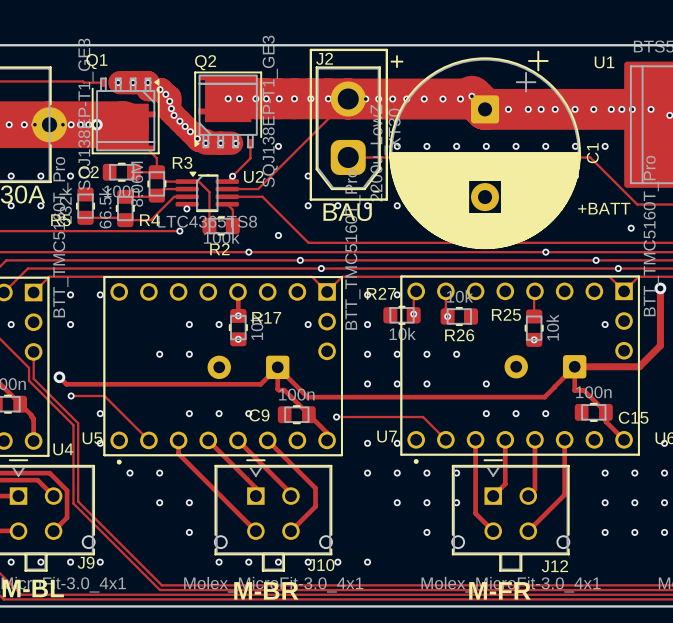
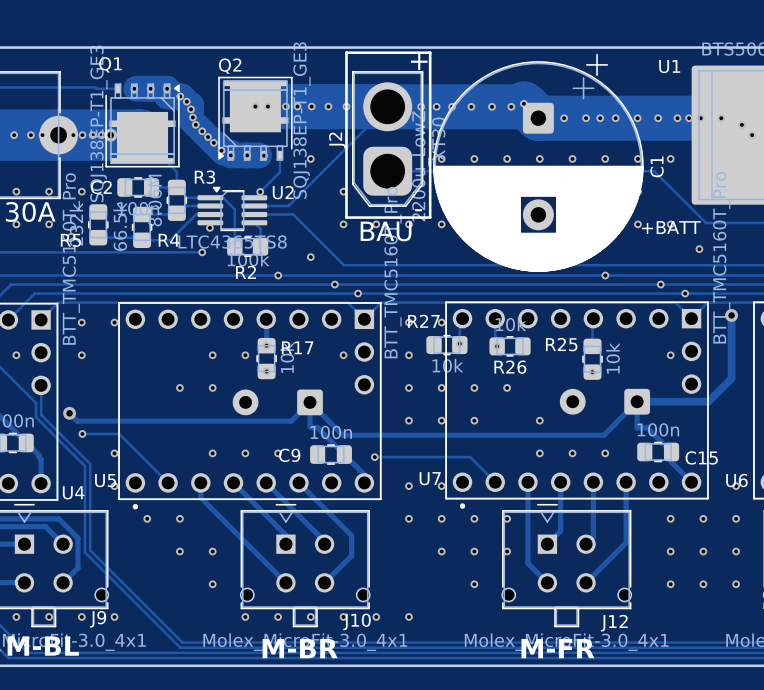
J2 name position: J2 (324, 58) -> J2 (337, 140)
J2 footprint: [315, 66, 381, 190] -> [352, 71, 424, 207]
via: (328, 98) -> none
via: (365, 99) -> none
via: none -> (637, 224)
via: none -> (670, 224)

